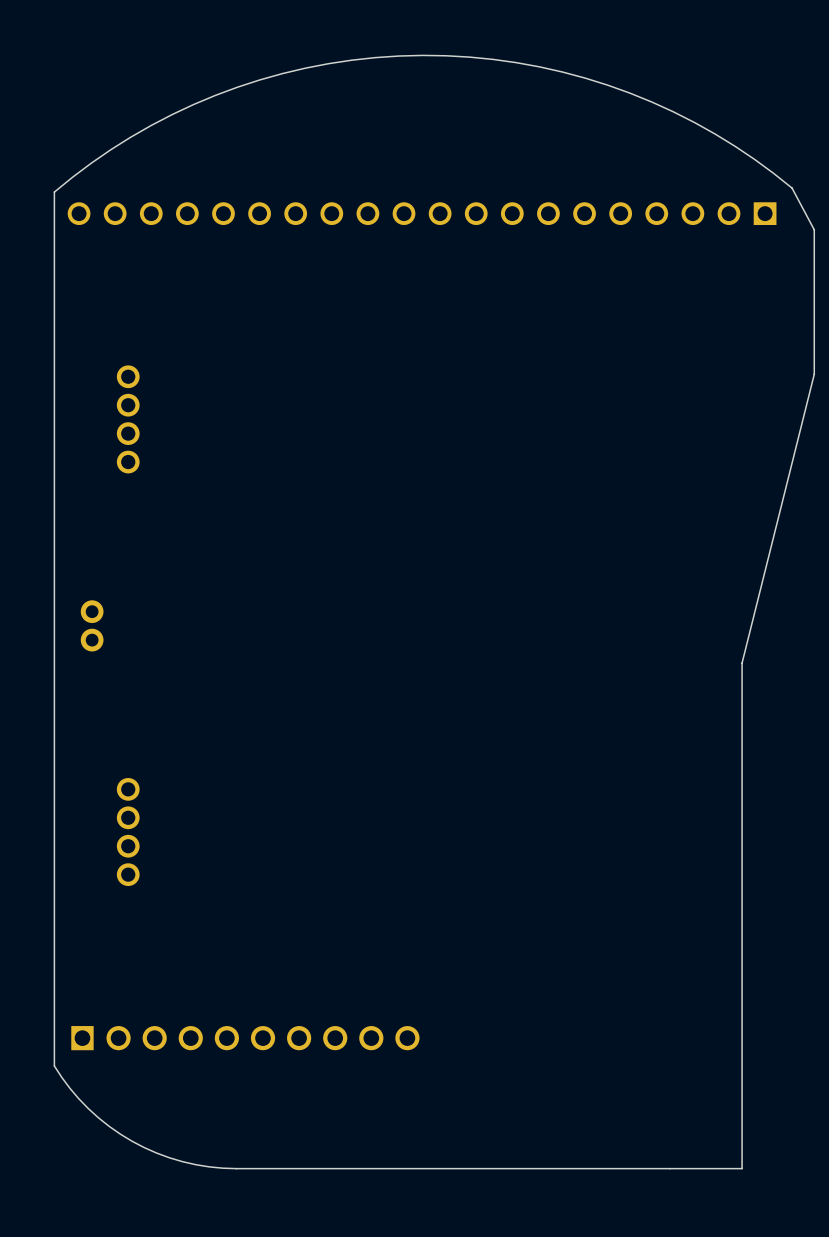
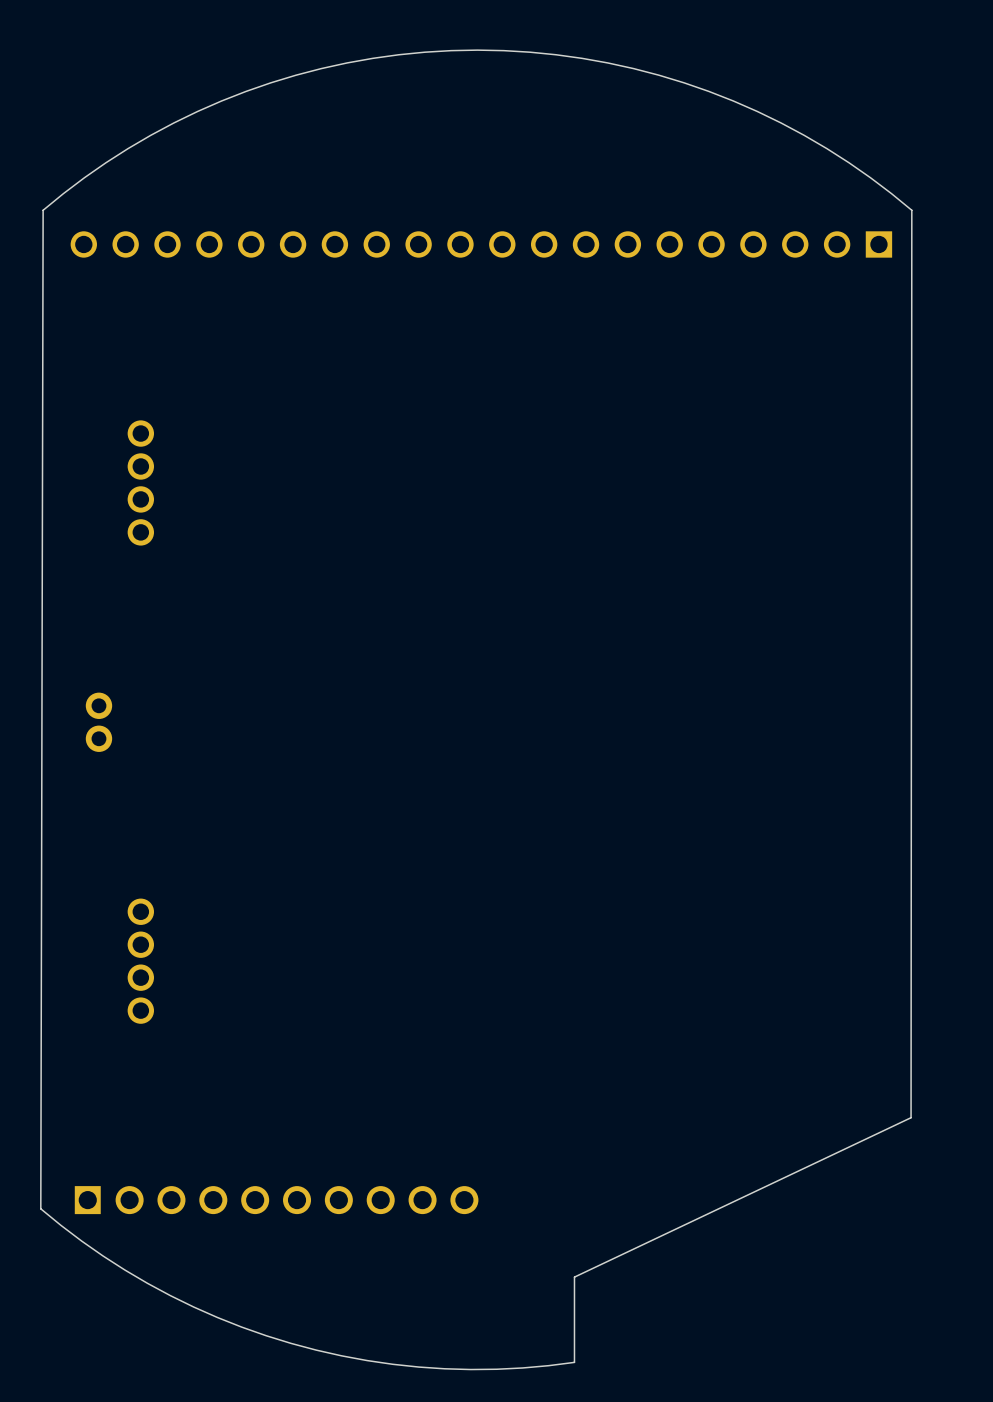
board edge: (792, 188) (814, 229) (814, 374) (742, 663) (742, 1168) (222, 1168) (182, 1161) (156, 1153) (132, 1141) (109, 1126) (78, 1098) (54, 1066) (54, 192) (91, 163) (130, 137) (193, 104) (237, 87) (282, 73) (328, 63) (375, 57) (422, 55) (469, 57) (516, 62) (562, 72) (630, 93) (673, 111) (714, 133) (754, 159) (792, 188) -> (911, 210) (911, 1117) (574, 1277) (574, 1362) (548, 1365) (496, 1369) (418, 1367) (341, 1355) (291, 1343) (241, 1327) (170, 1295) (103, 1255) (40, 1208) (43, 210) (84, 177) (128, 148) (197, 111) (246, 91) (321, 68) (372, 58) (425, 52) (477, 50) (556, 54) (607, 62) (658, 75) (708, 91) (781, 122) (826, 148) (870, 177) (911, 210)

